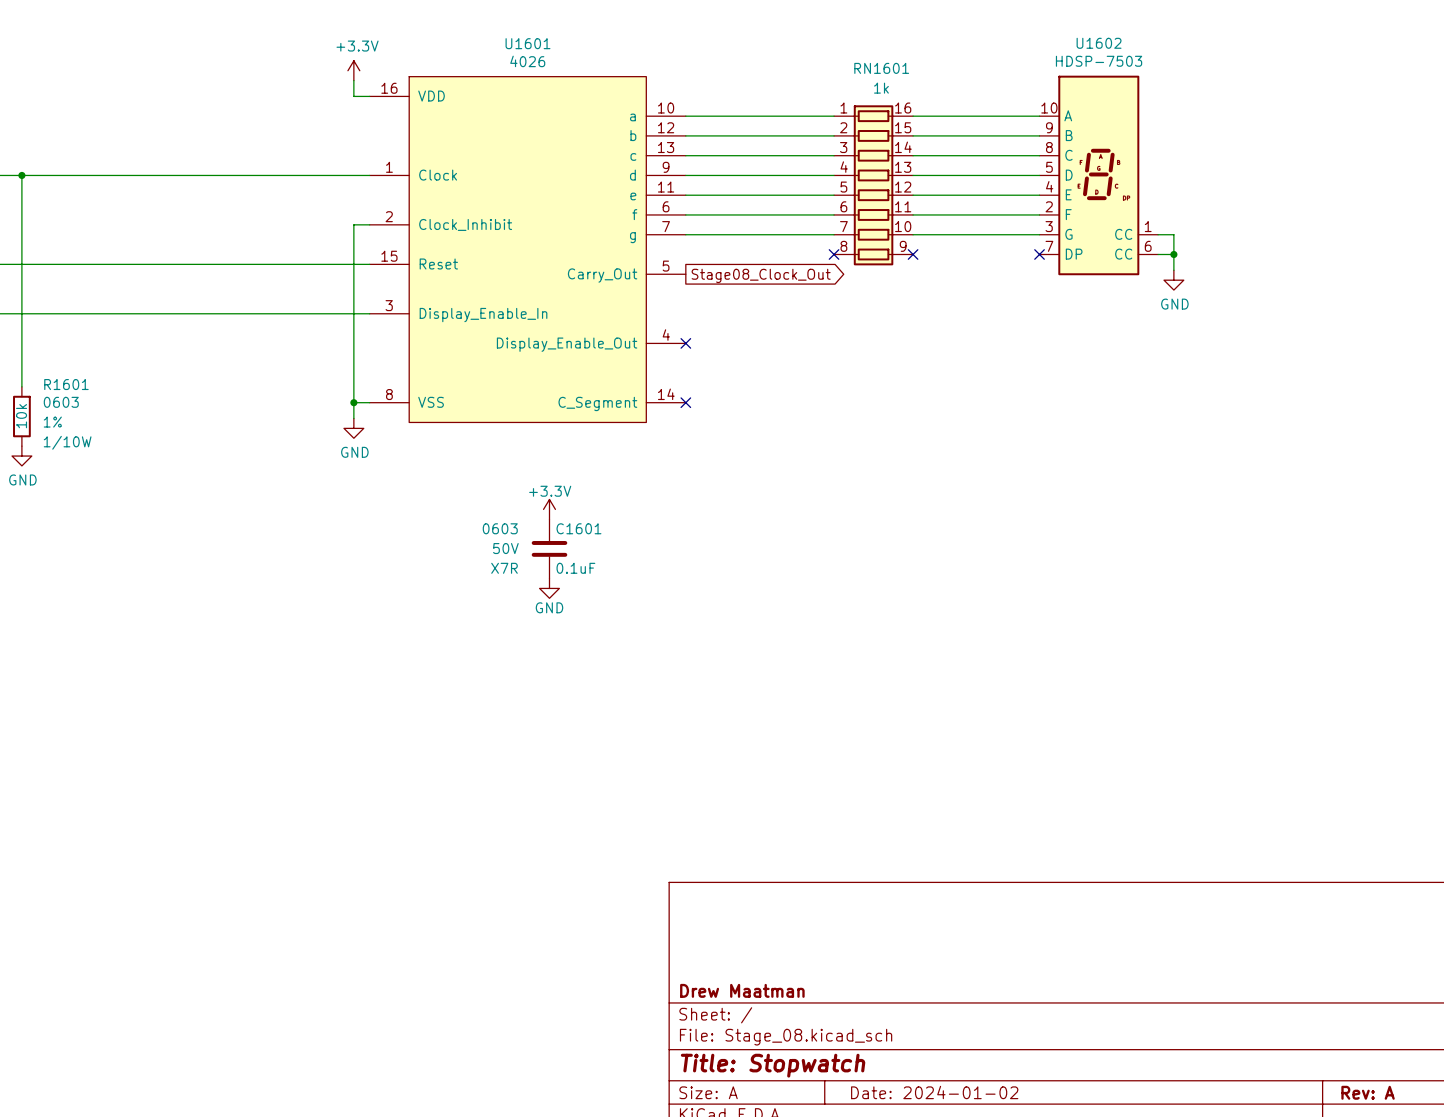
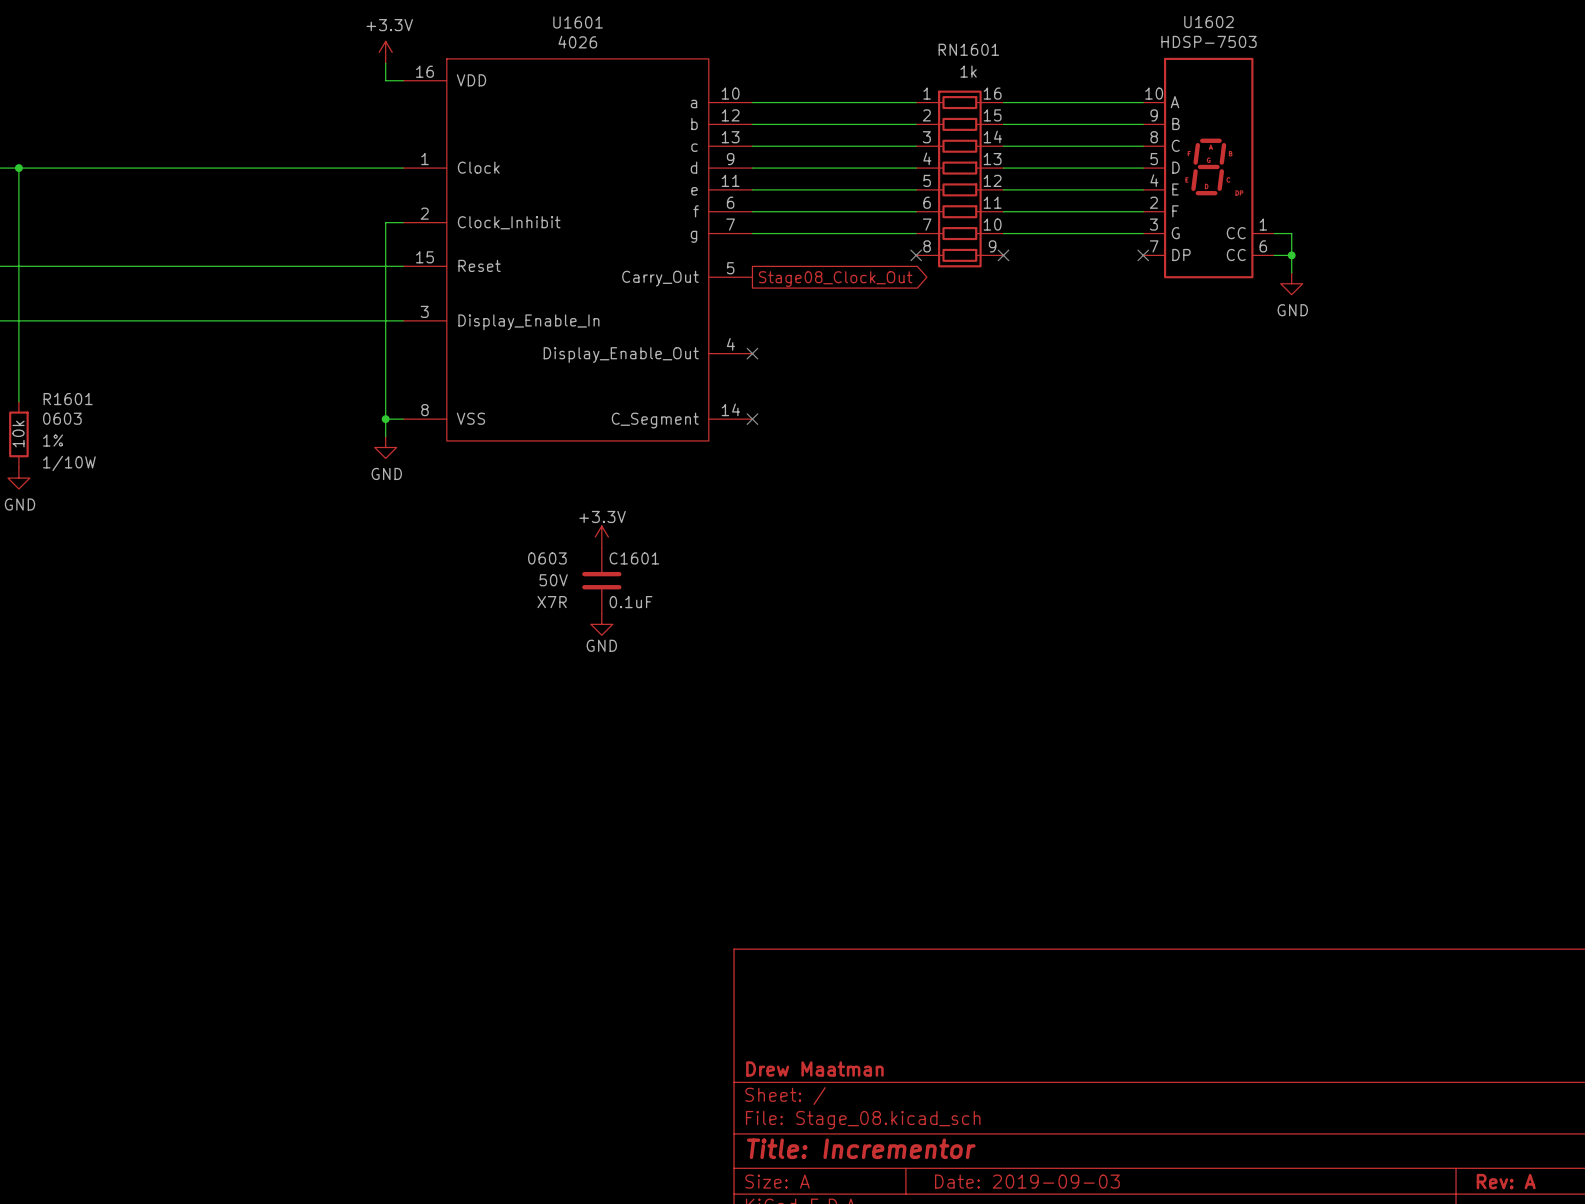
title block: Title: Stopwatch (773, 1065) -> Title: Incrementor (861, 1148)
title block: Date: 2024-01-02 (934, 1092) -> Date: 2019-09-03 (1027, 1181)

